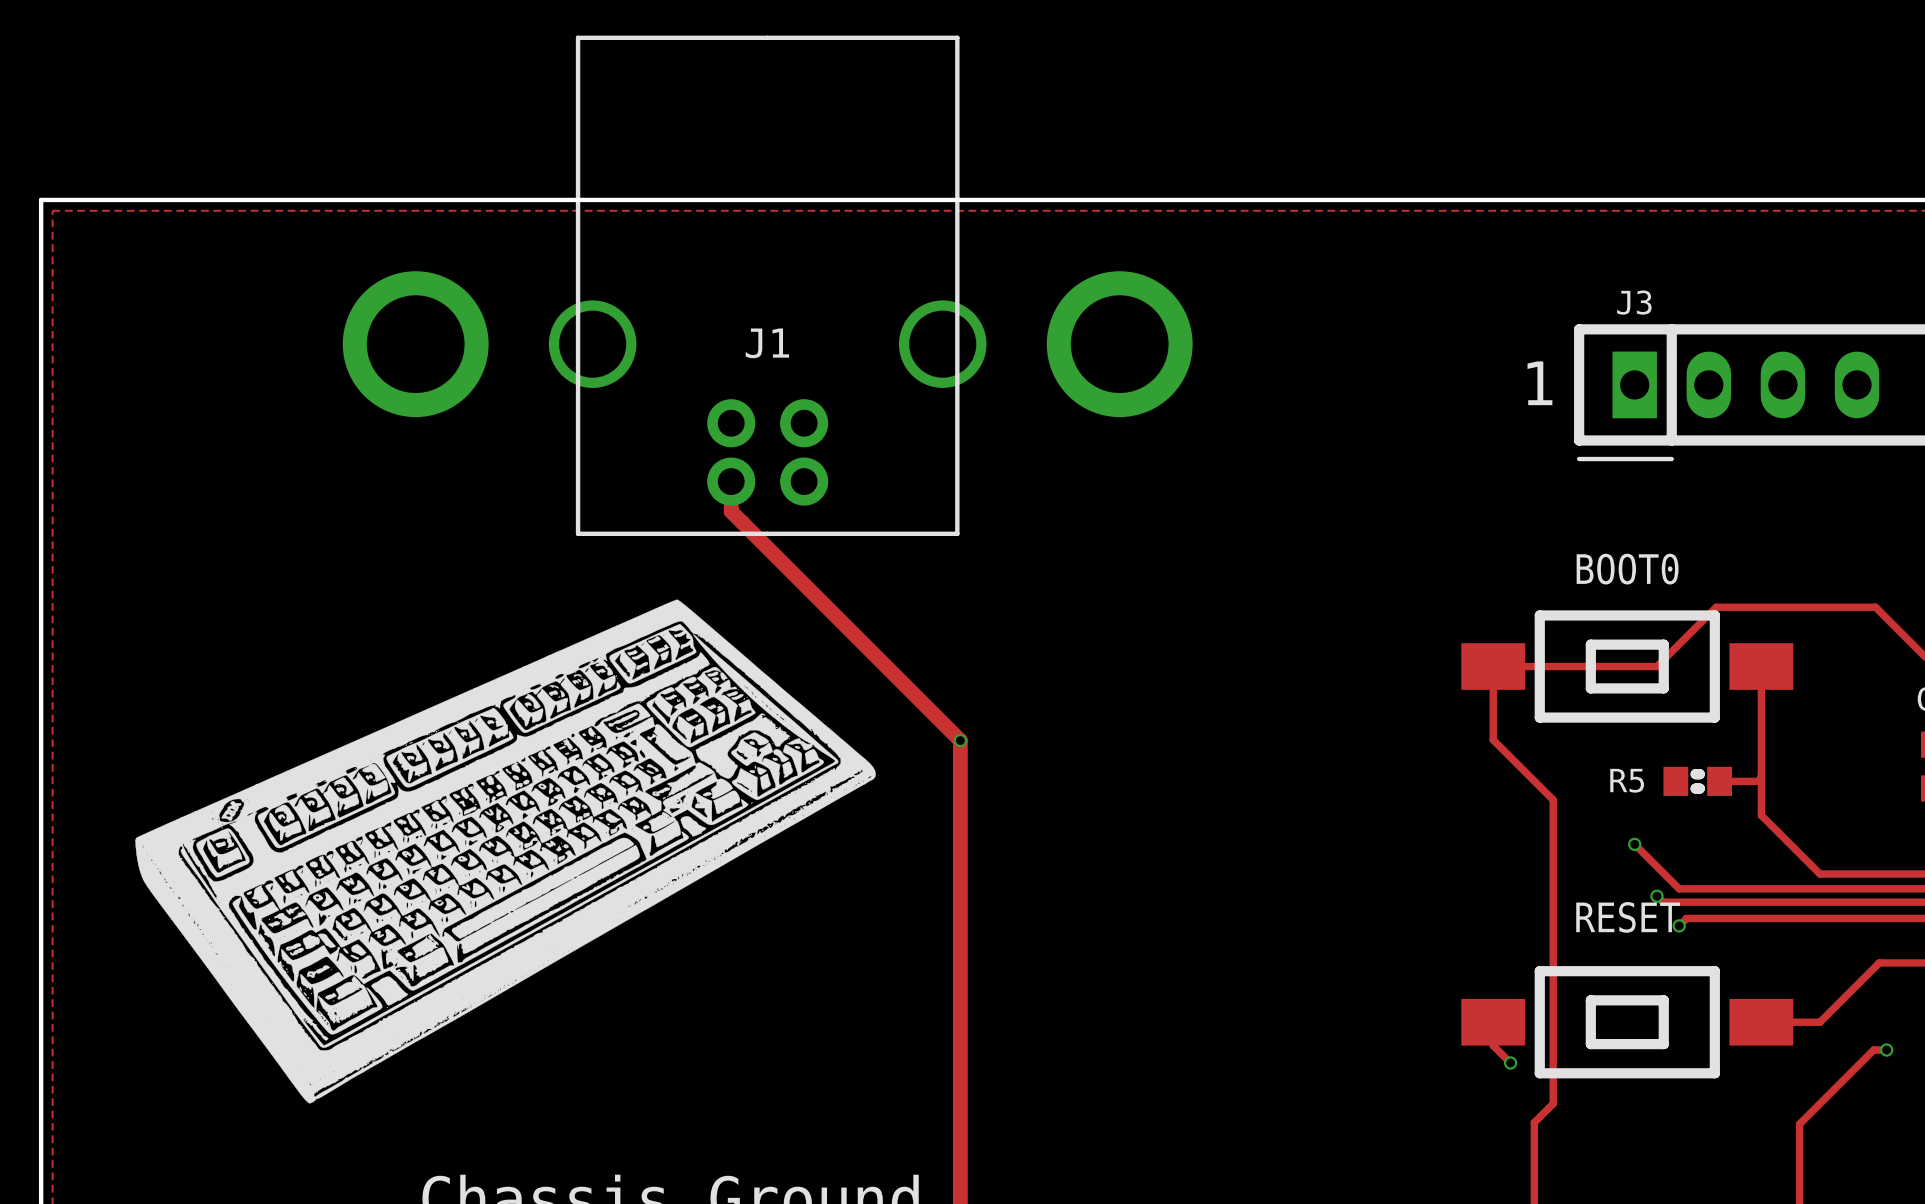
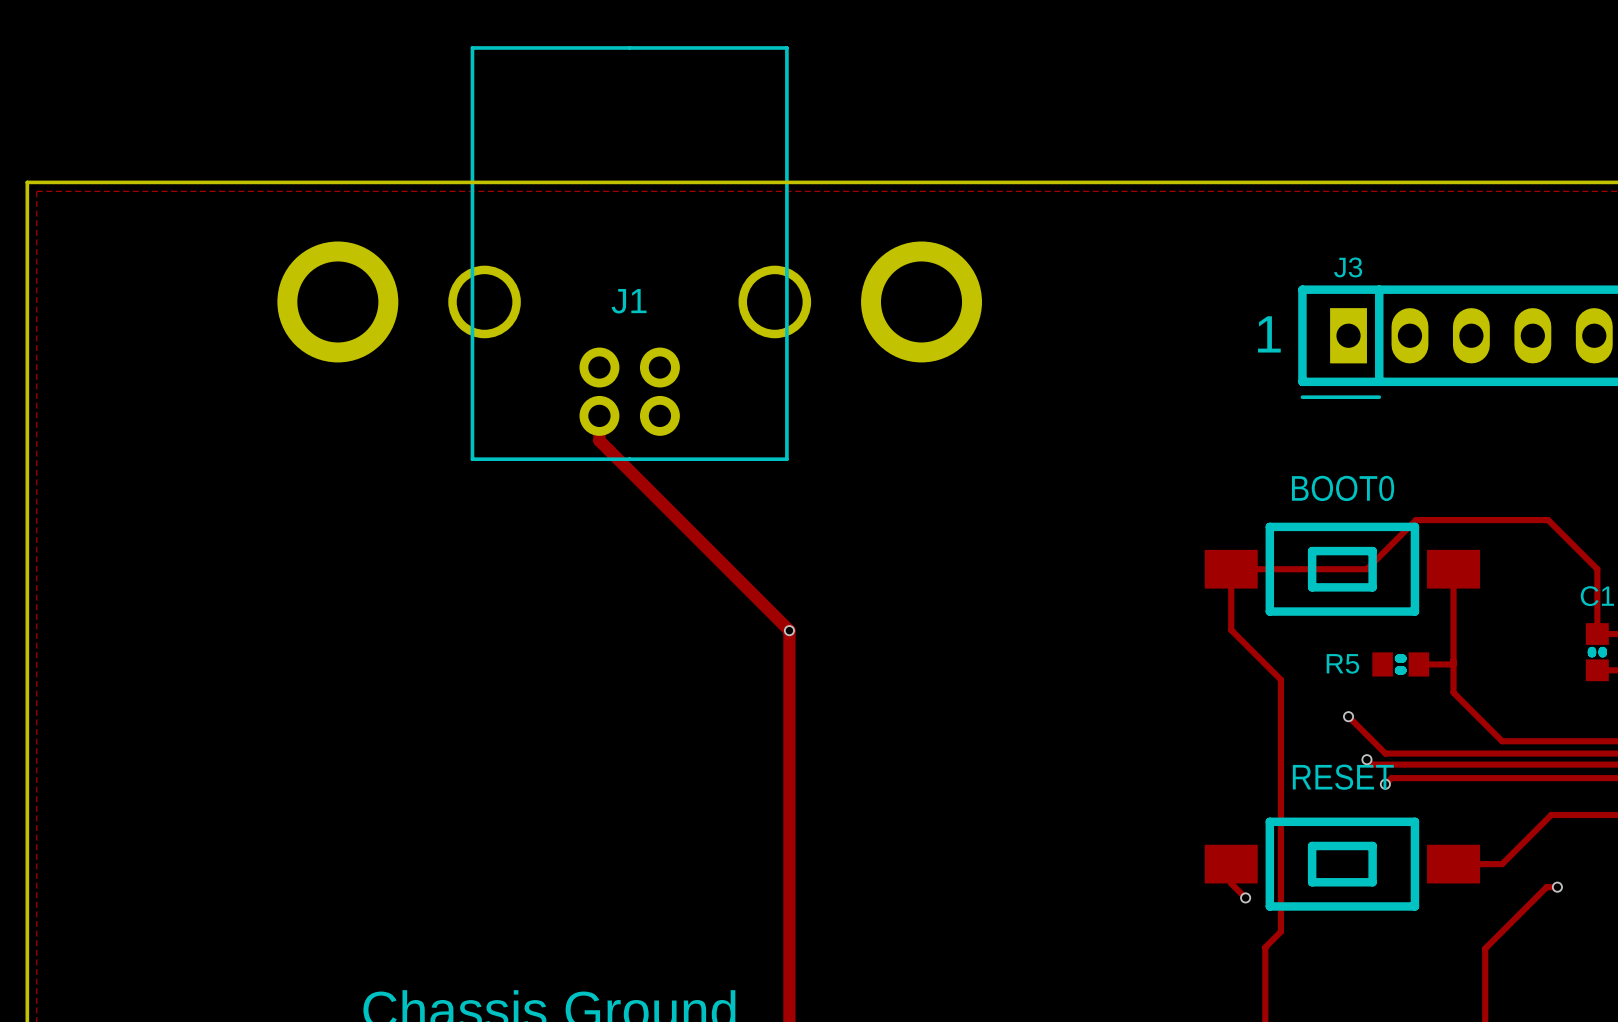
drawing: [135, 599, 876, 1104] -> none

